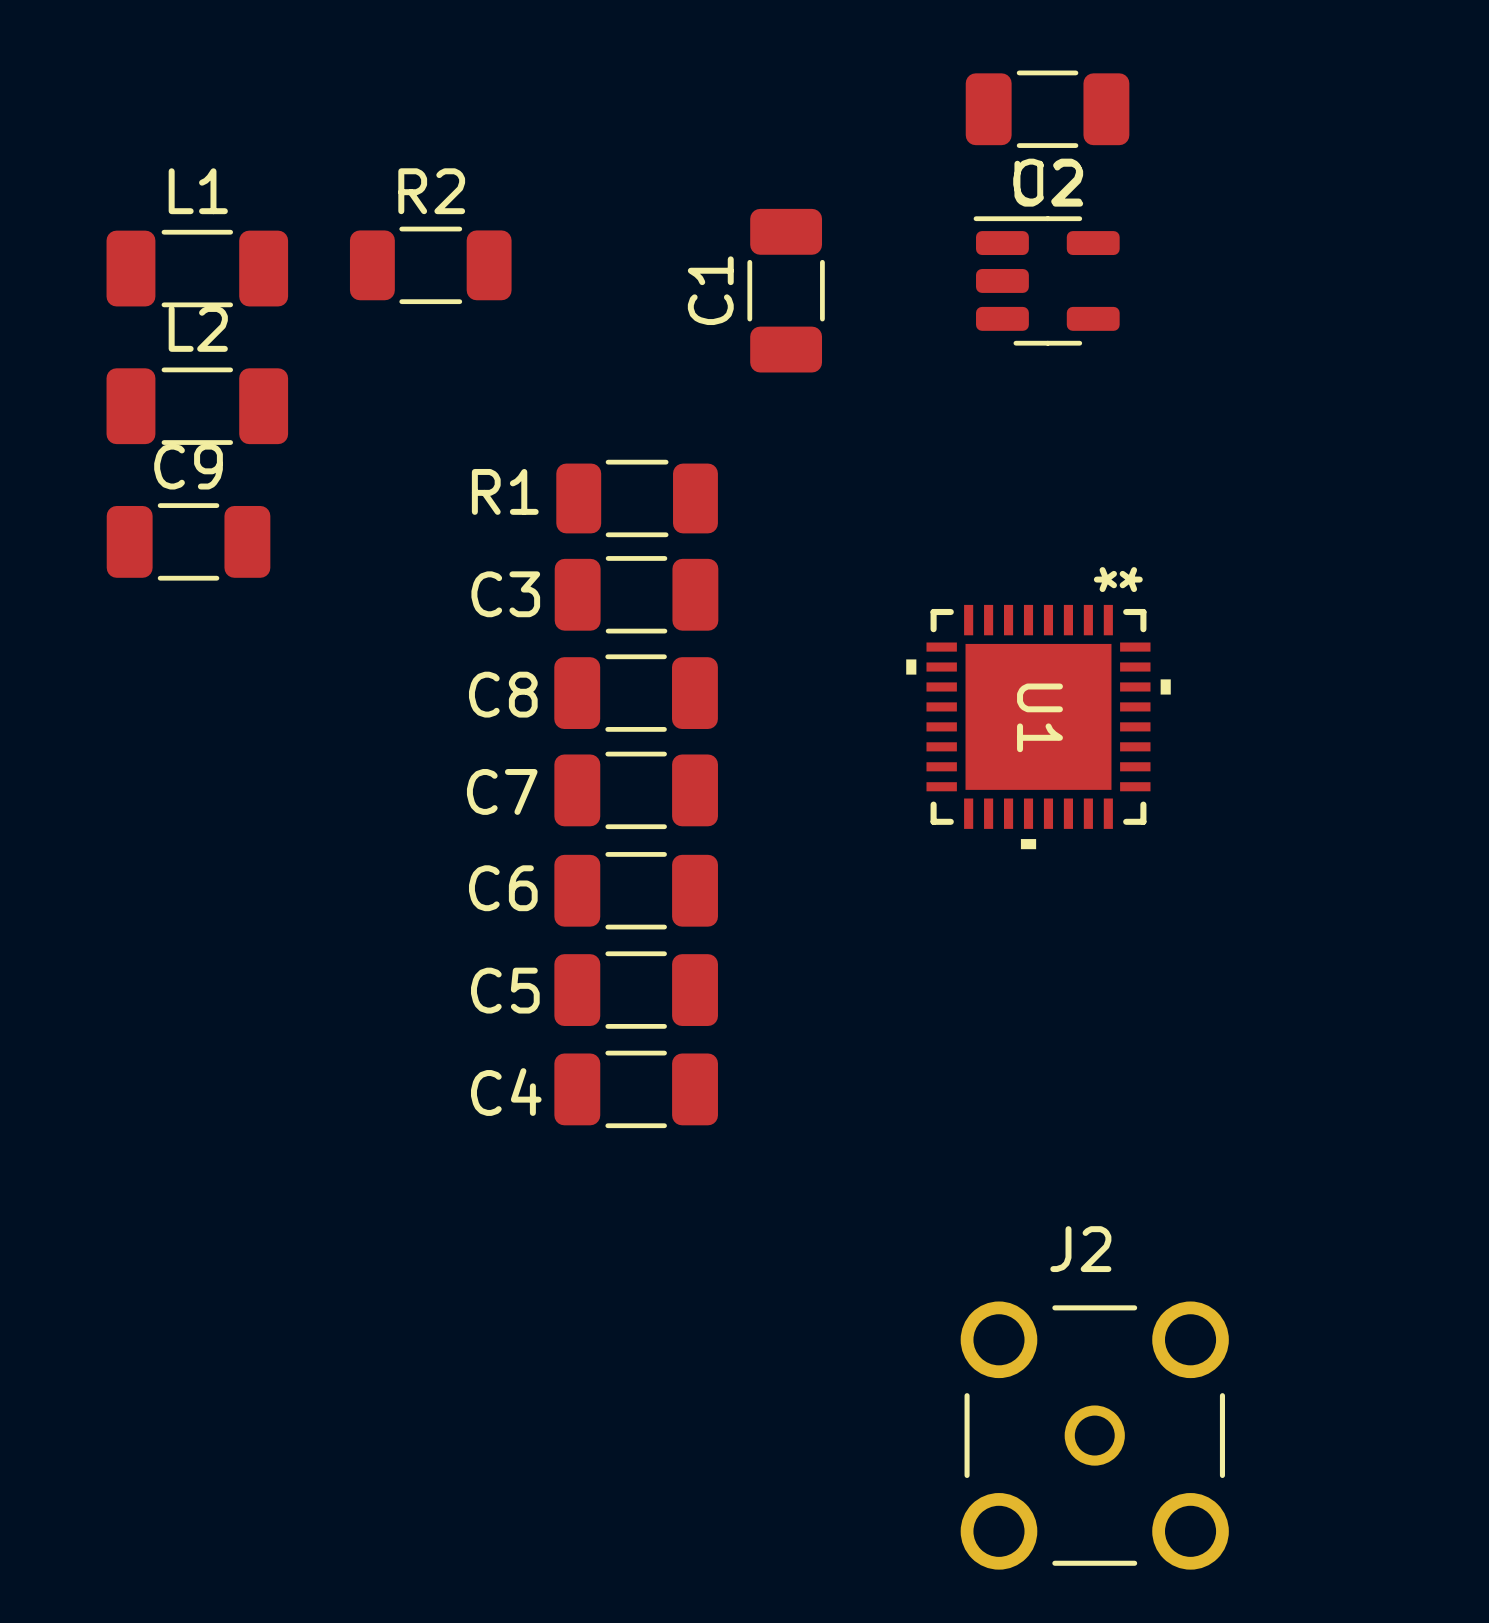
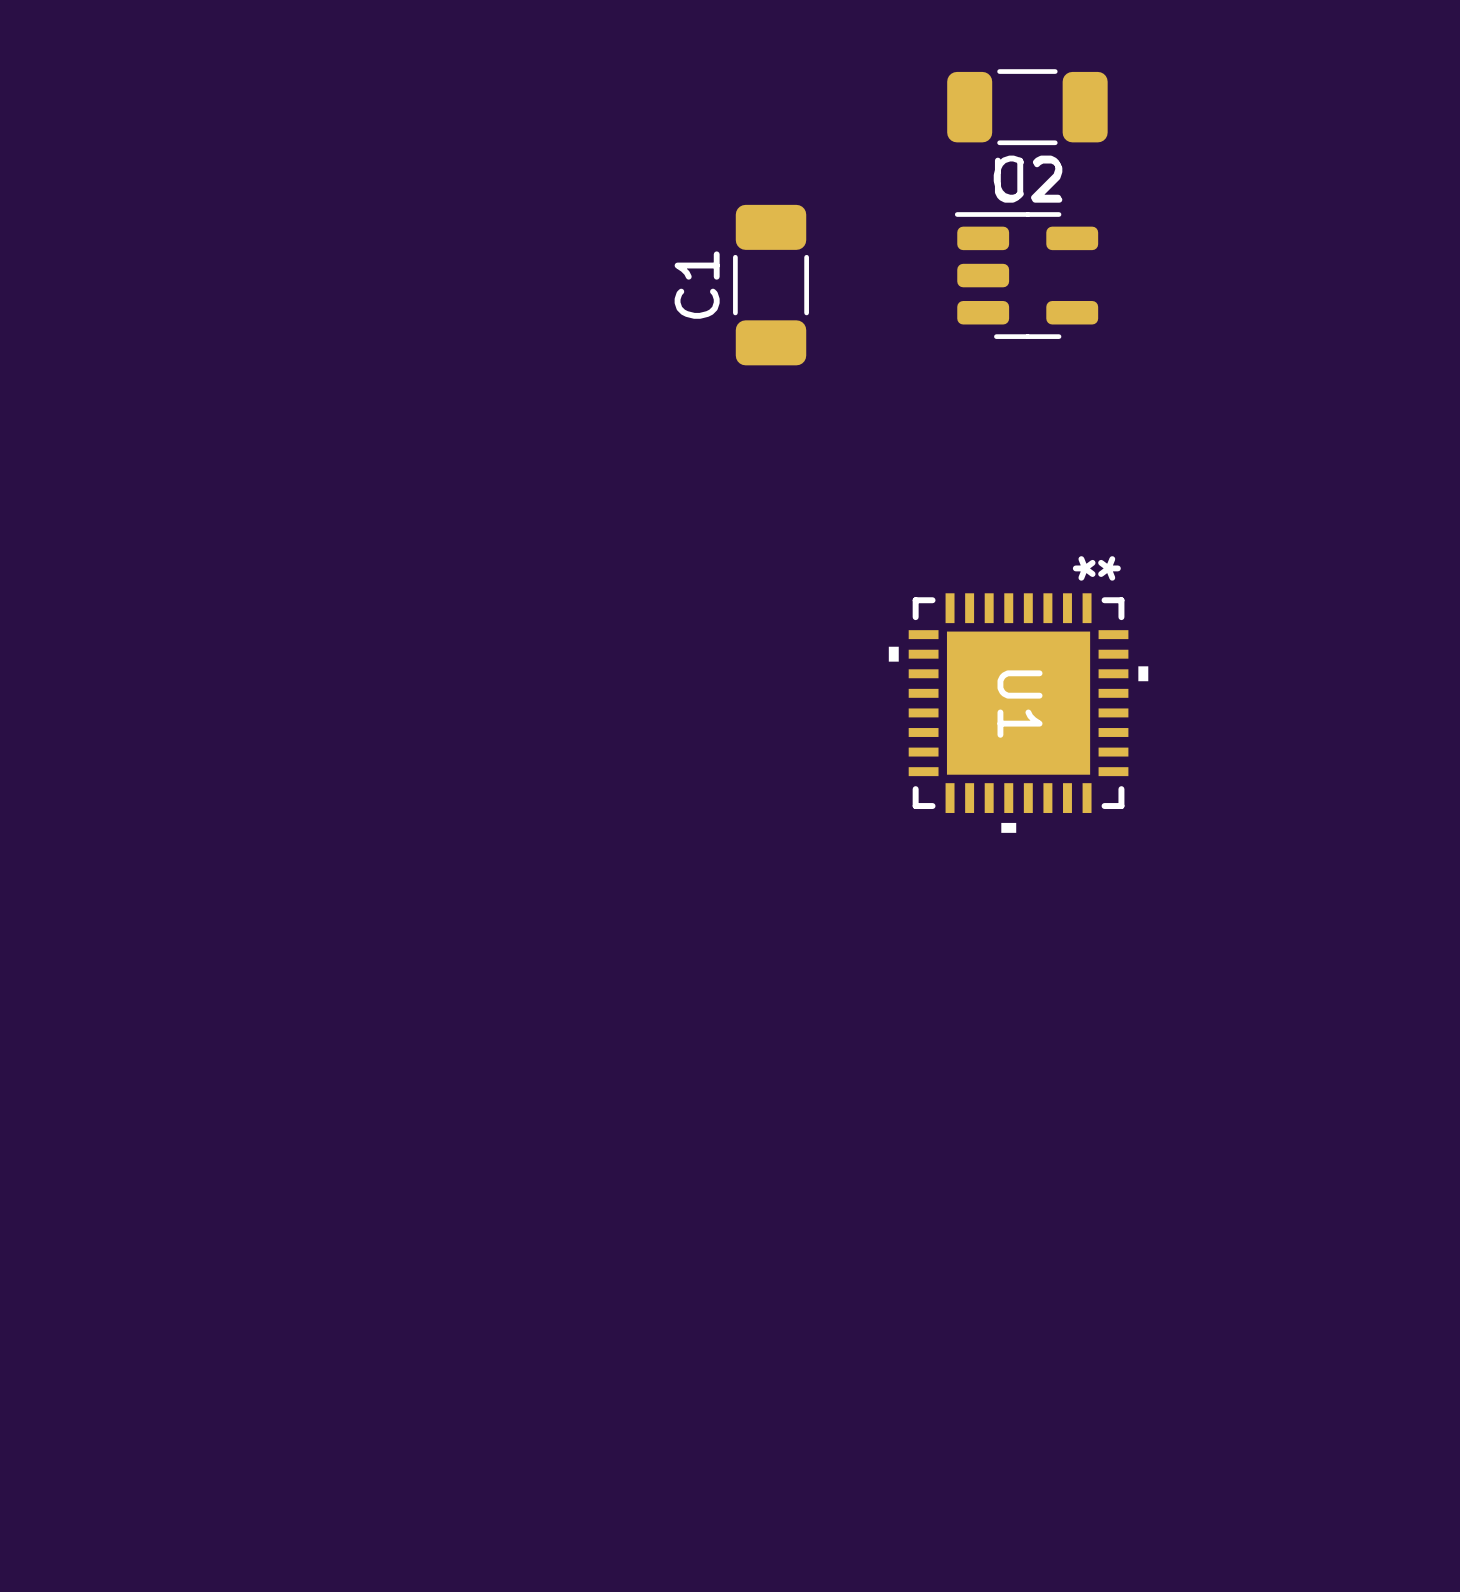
R2: (430, 265) -> none
L1: (197, 268) -> none
L2: (197, 406) -> none
R1: (637, 498) -> none
C9: (188, 541) -> none
C3: (636, 594) -> none
C8: (636, 693) -> none
C7: (636, 790) -> none
C6: (636, 890) -> none
C5: (636, 990) -> none
C4: (636, 1089) -> none
J2: (1094, 1435) -> none

